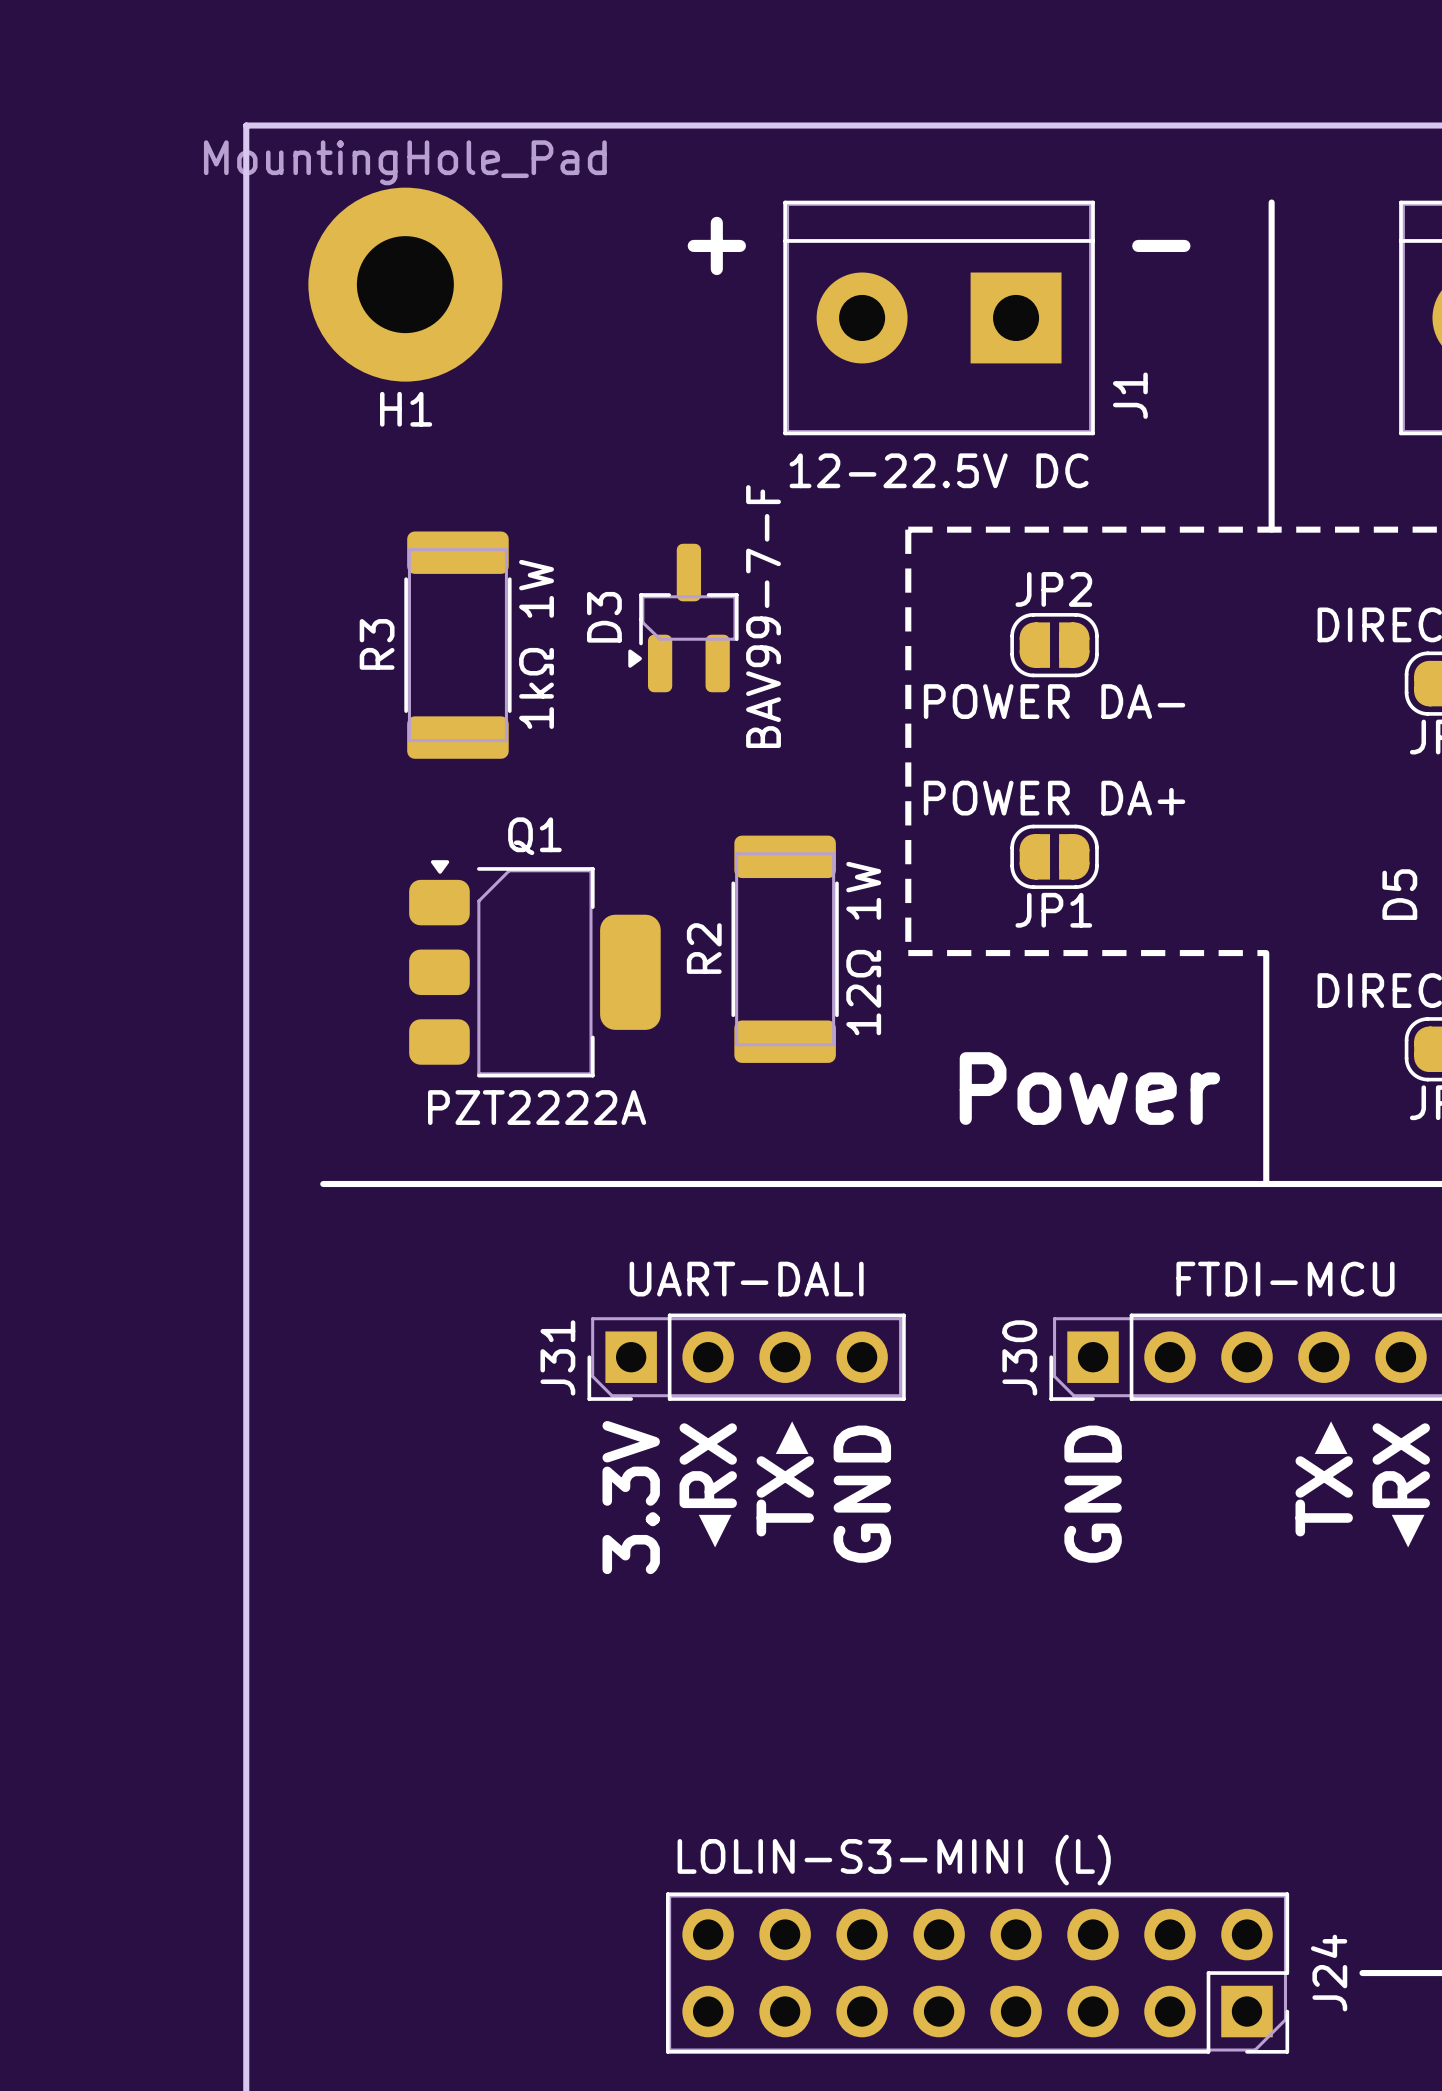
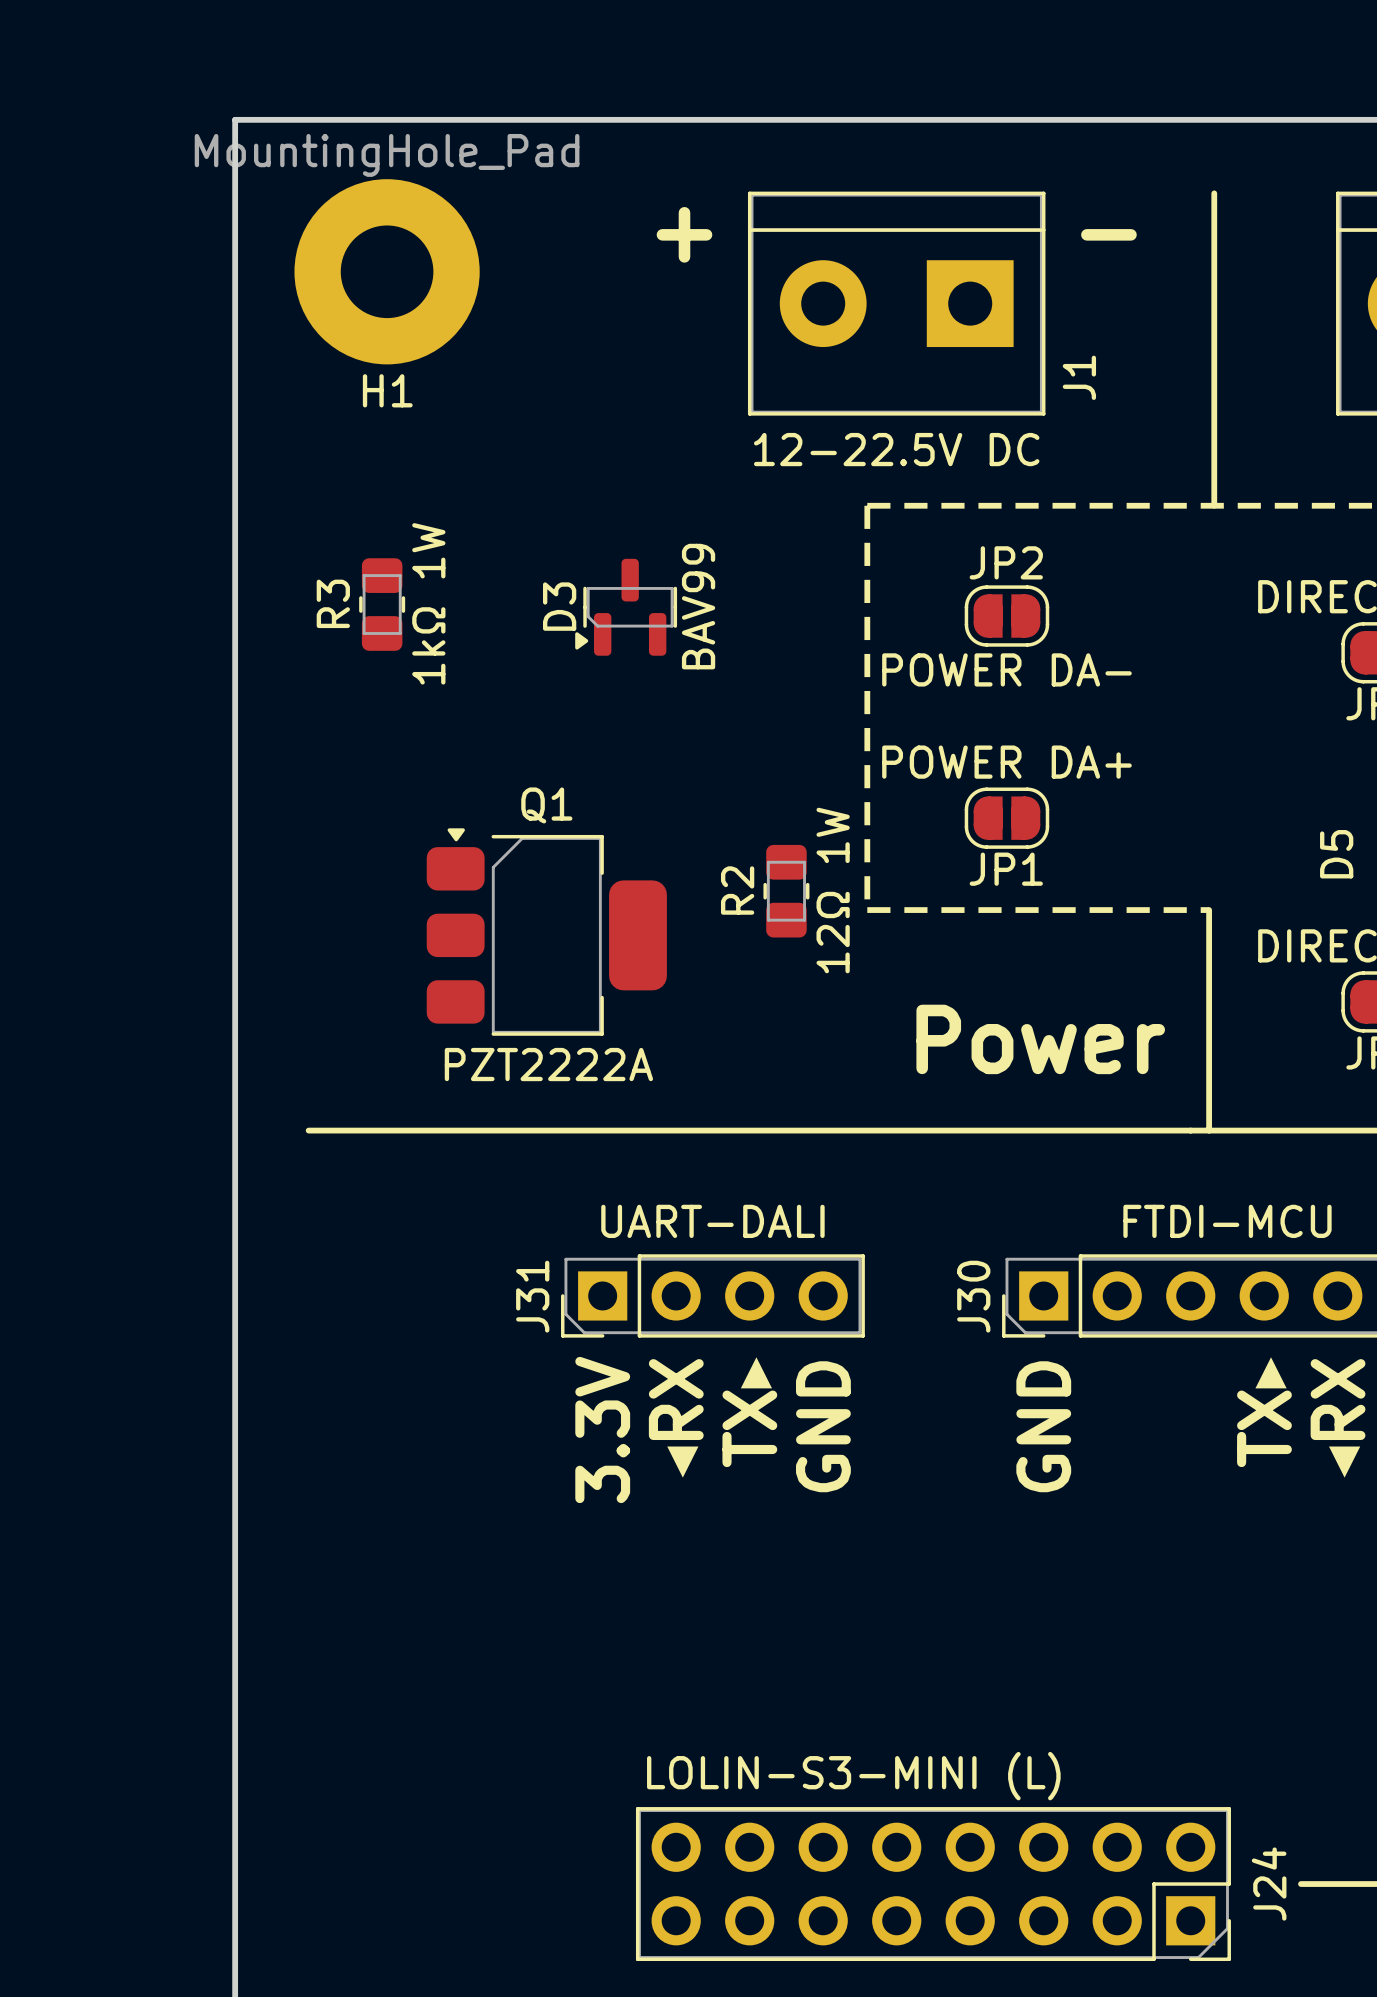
R3 footprint: [404, 531, 512, 759] -> [359, 558, 406, 651]
D3 footprint: [628, 543, 739, 693] -> [575, 558, 678, 656]
D3 value: BAV99-7-F (763, 616) -> BAV99 (698, 606)
R2 footprint: [731, 835, 839, 1063] -> [763, 844, 810, 938]
Q1 position: (534, 968) -> (546, 932)

